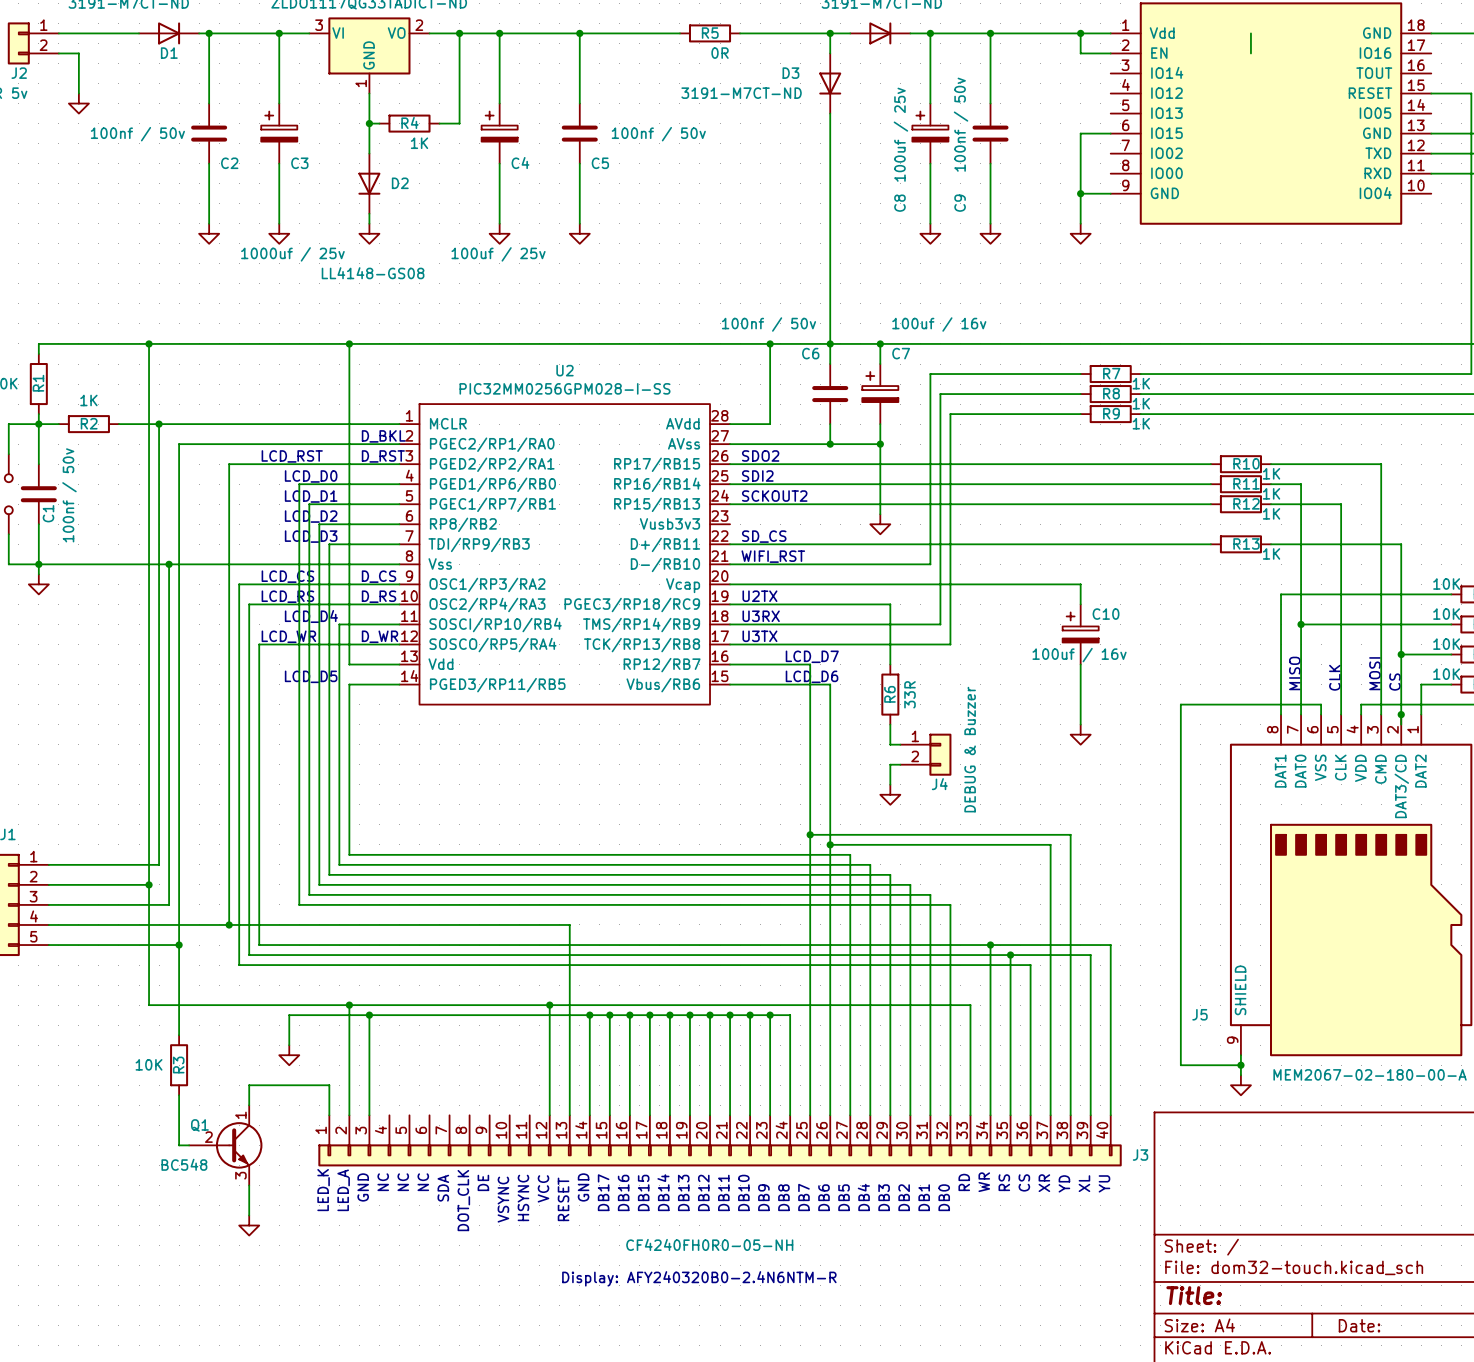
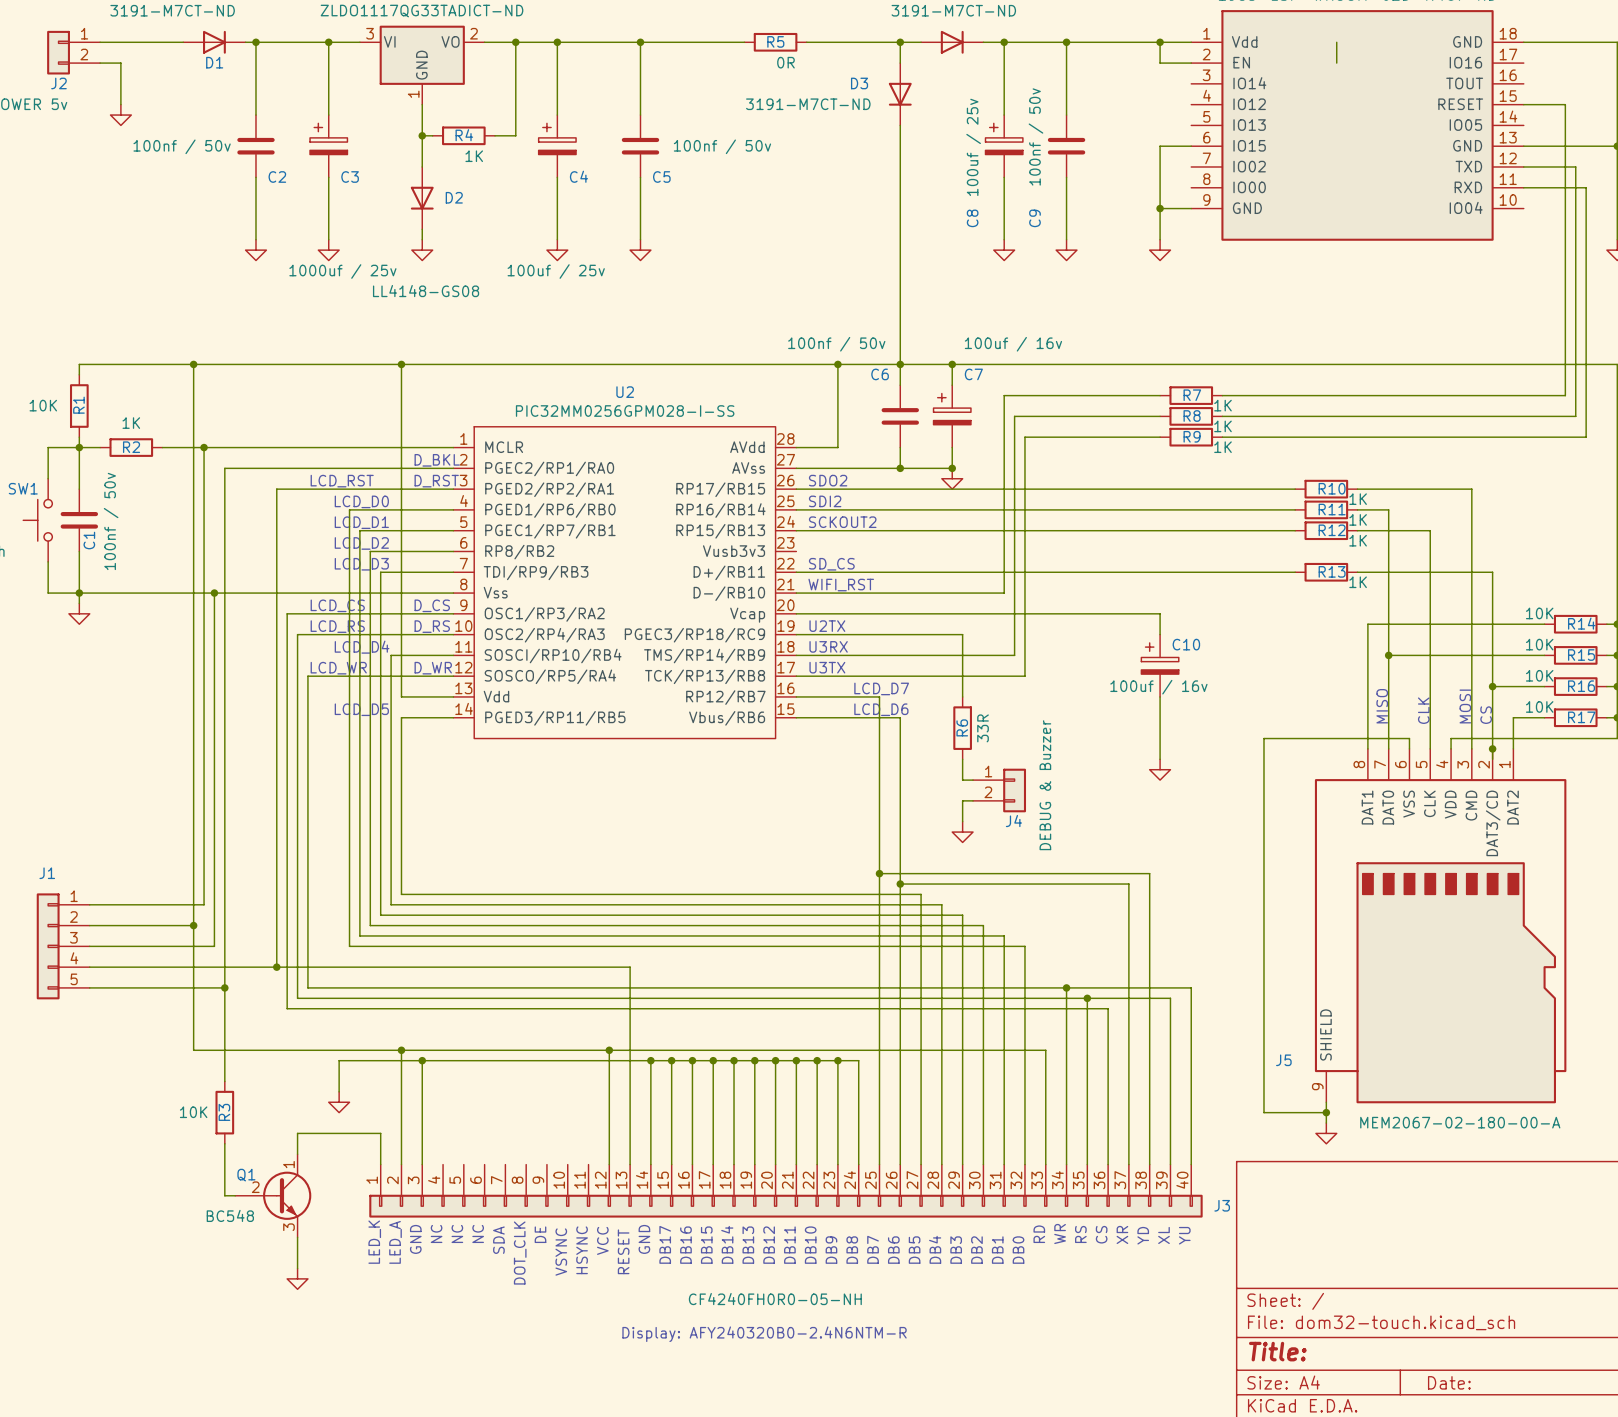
wire: (880, 444) (880, 514) -> none
power symbol position: (880, 524) -> (952, 478)

